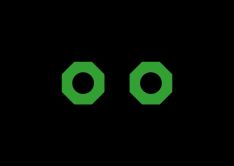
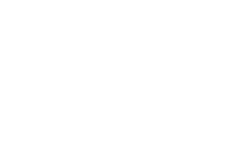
part: (117, 83) -> none

